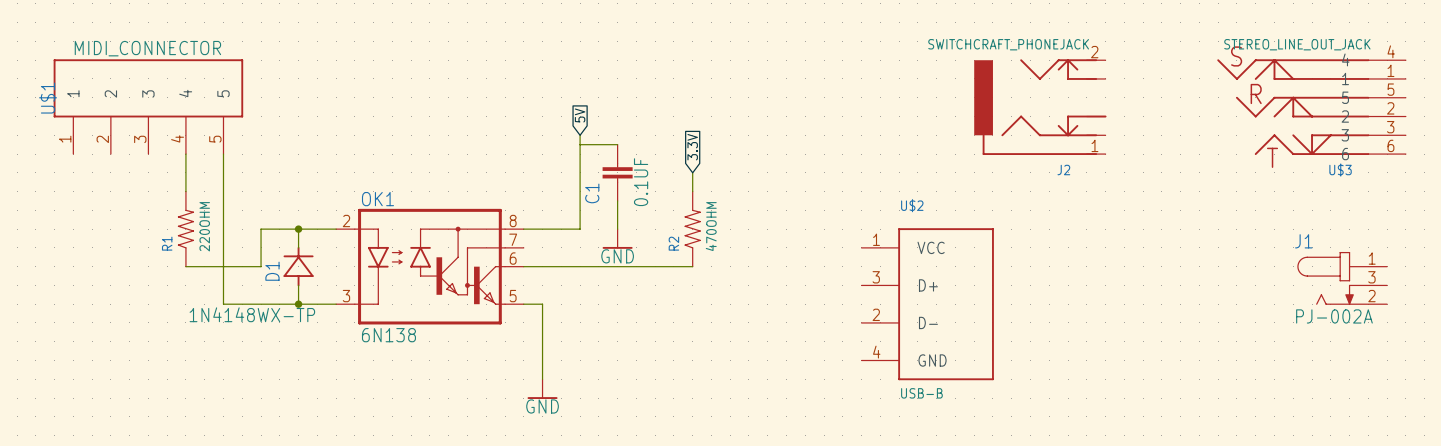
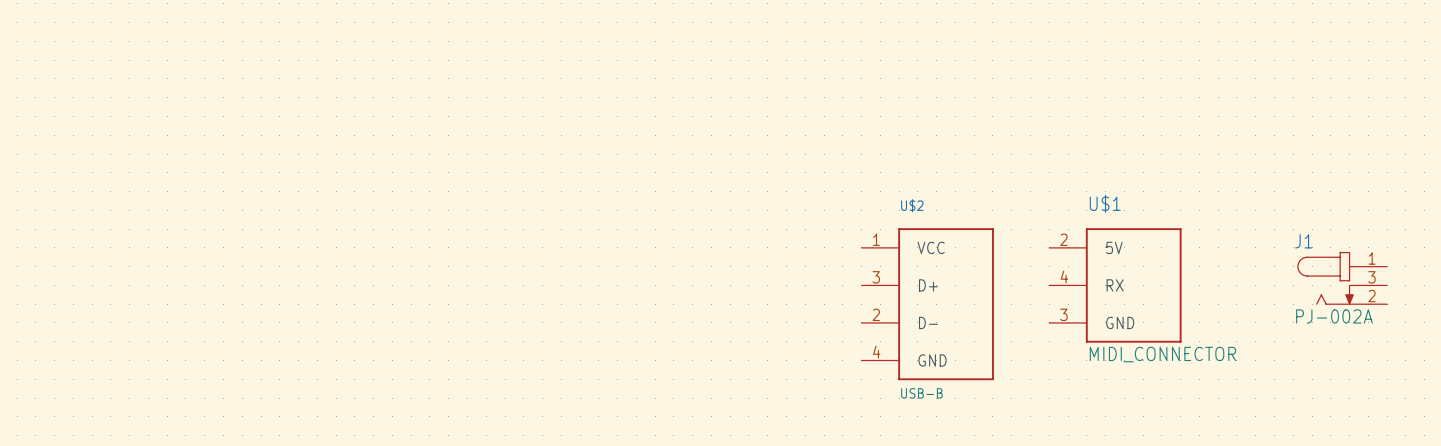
U$1 value position: MIDI_CONNECTOR (147, 48) -> MIDI_CONNECTOR (1162, 354)
U$1 symbol: [53, 59, 244, 155] -> [1049, 228, 1182, 343]
U$1 name position: U$1 (48, 98) -> U$1 (1105, 203)
J2: SWITCHCRAFT_PHONEJACK (1040, 107) -> none
U$3: STEREO_LINE_OUT_JACK (1311, 107) -> none
global label: 5V (580, 115) -> none
wire: (580, 135) (580, 229) (523, 229) -> none
wire: (580, 144) (617, 144) -> none
global label: 3.3V (692, 147) -> none
wire: (185, 154) (185, 191) -> none
wire: (223, 154) (223, 304) (336, 304) -> none
C1: 0.1UF (617, 172) -> none
wire: (692, 172) (692, 191) -> none
wire: (617, 200) (617, 229) -> none
R1: 220OHM (185, 229) -> none
wire: (298, 229) (298, 247) -> none
junction: (298, 229) -> none
wire: (336, 229) (261, 229) (261, 266) (185, 266) -> none
R2: 470OHM (692, 229) -> none
power symbol: GND (617, 238) -> none
D1: 1N4148WX-TP (298, 266) -> none
OK1: 6N138 (429, 266) -> none
wire: (523, 266) (692, 266) -> none
wire: (298, 285) (298, 304) -> none
junction: (298, 304) -> none
wire: (523, 304) (542, 304) (542, 379) -> none
power symbol: GND (542, 389) -> none

